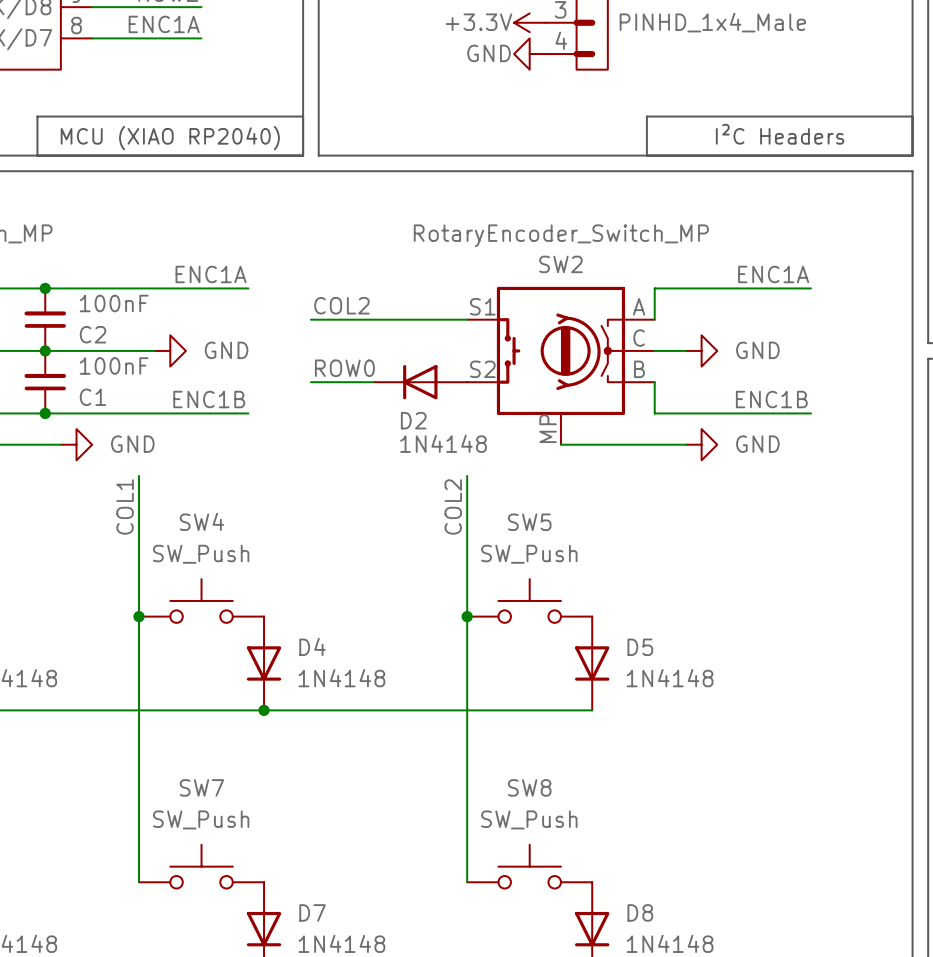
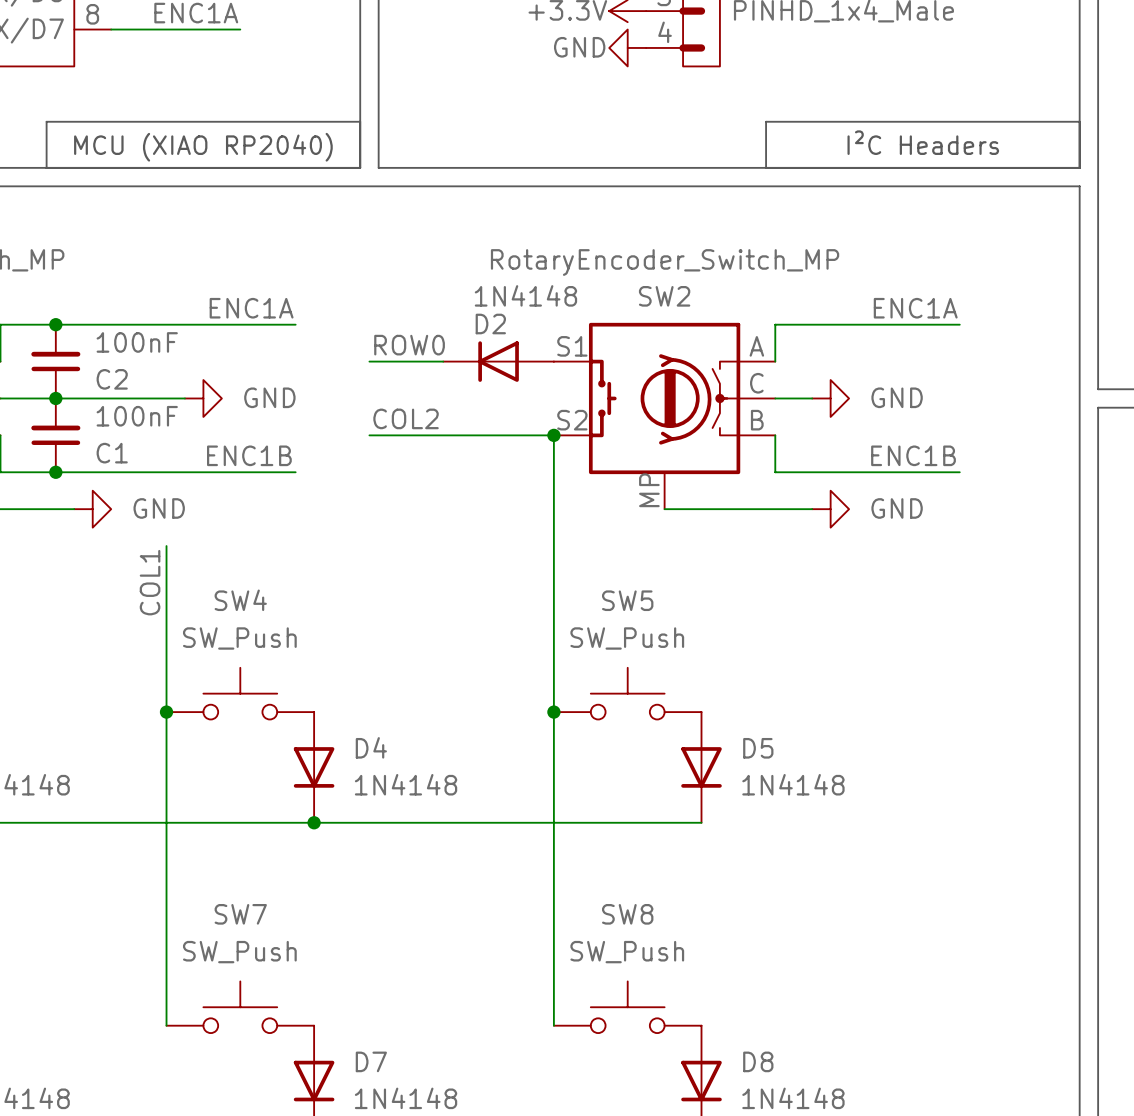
label: COL2 (341, 305) -> ROW0 (409, 345)
label: ROW0 (344, 368) -> COL2 (406, 418)
wire: none -> (443, 435) (553, 435) (553, 546)
D2 position: (420, 382) -> (498, 361)
junction: none -> (553, 435)
D2 name position: D2 (413, 420) -> D2 (490, 324)
D2 value position: 1N4148 (443, 443) -> 1N4148 (525, 295)
label: COL2 (453, 506) -> none

